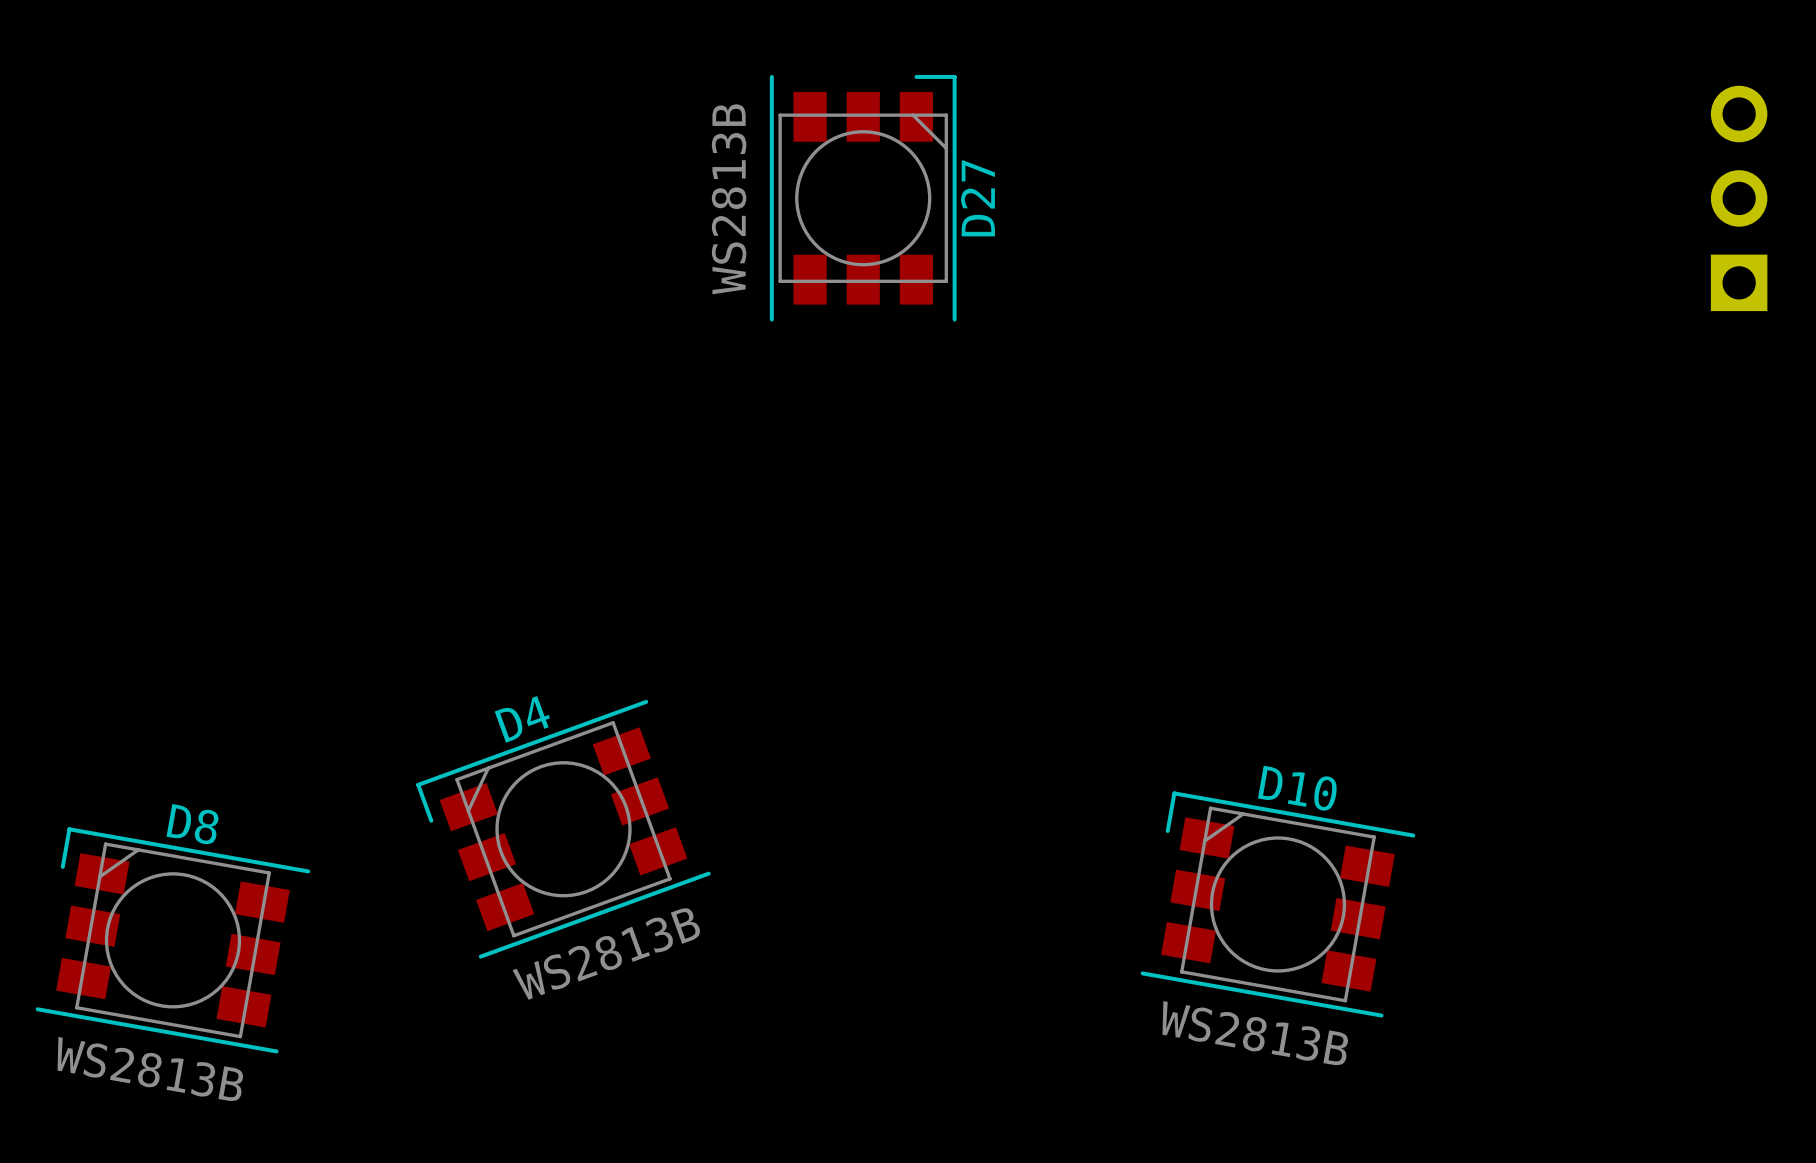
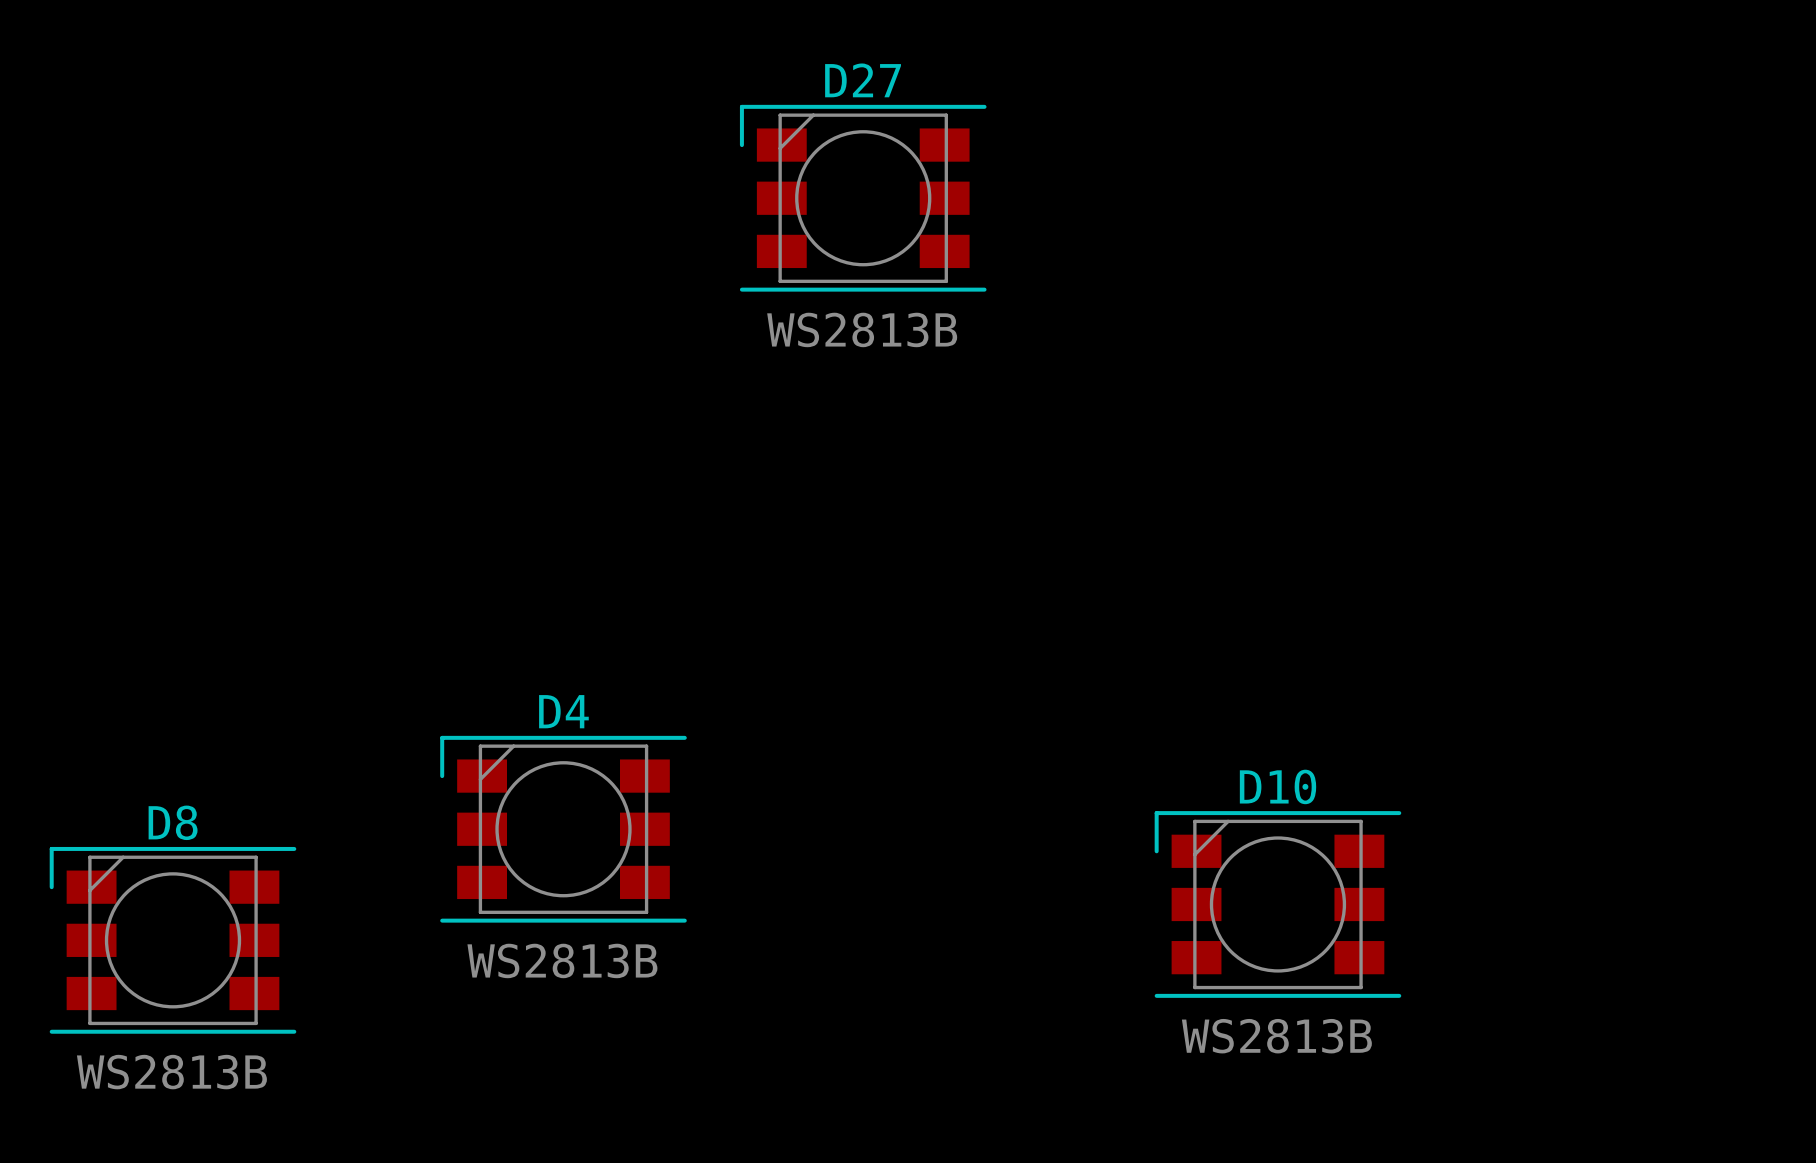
D27 rotation: 0° (863, 198) -> 90° counterclockwise (863, 198)
part: (1739, 198) -> none
D4 rotation: 0° (563, 829) -> 20° clockwise (563, 829)
D10 rotation: 0° (1277, 904) -> 10° counterclockwise (1277, 904)
D8 rotation: 0° (173, 940) -> 10° counterclockwise (173, 940)

